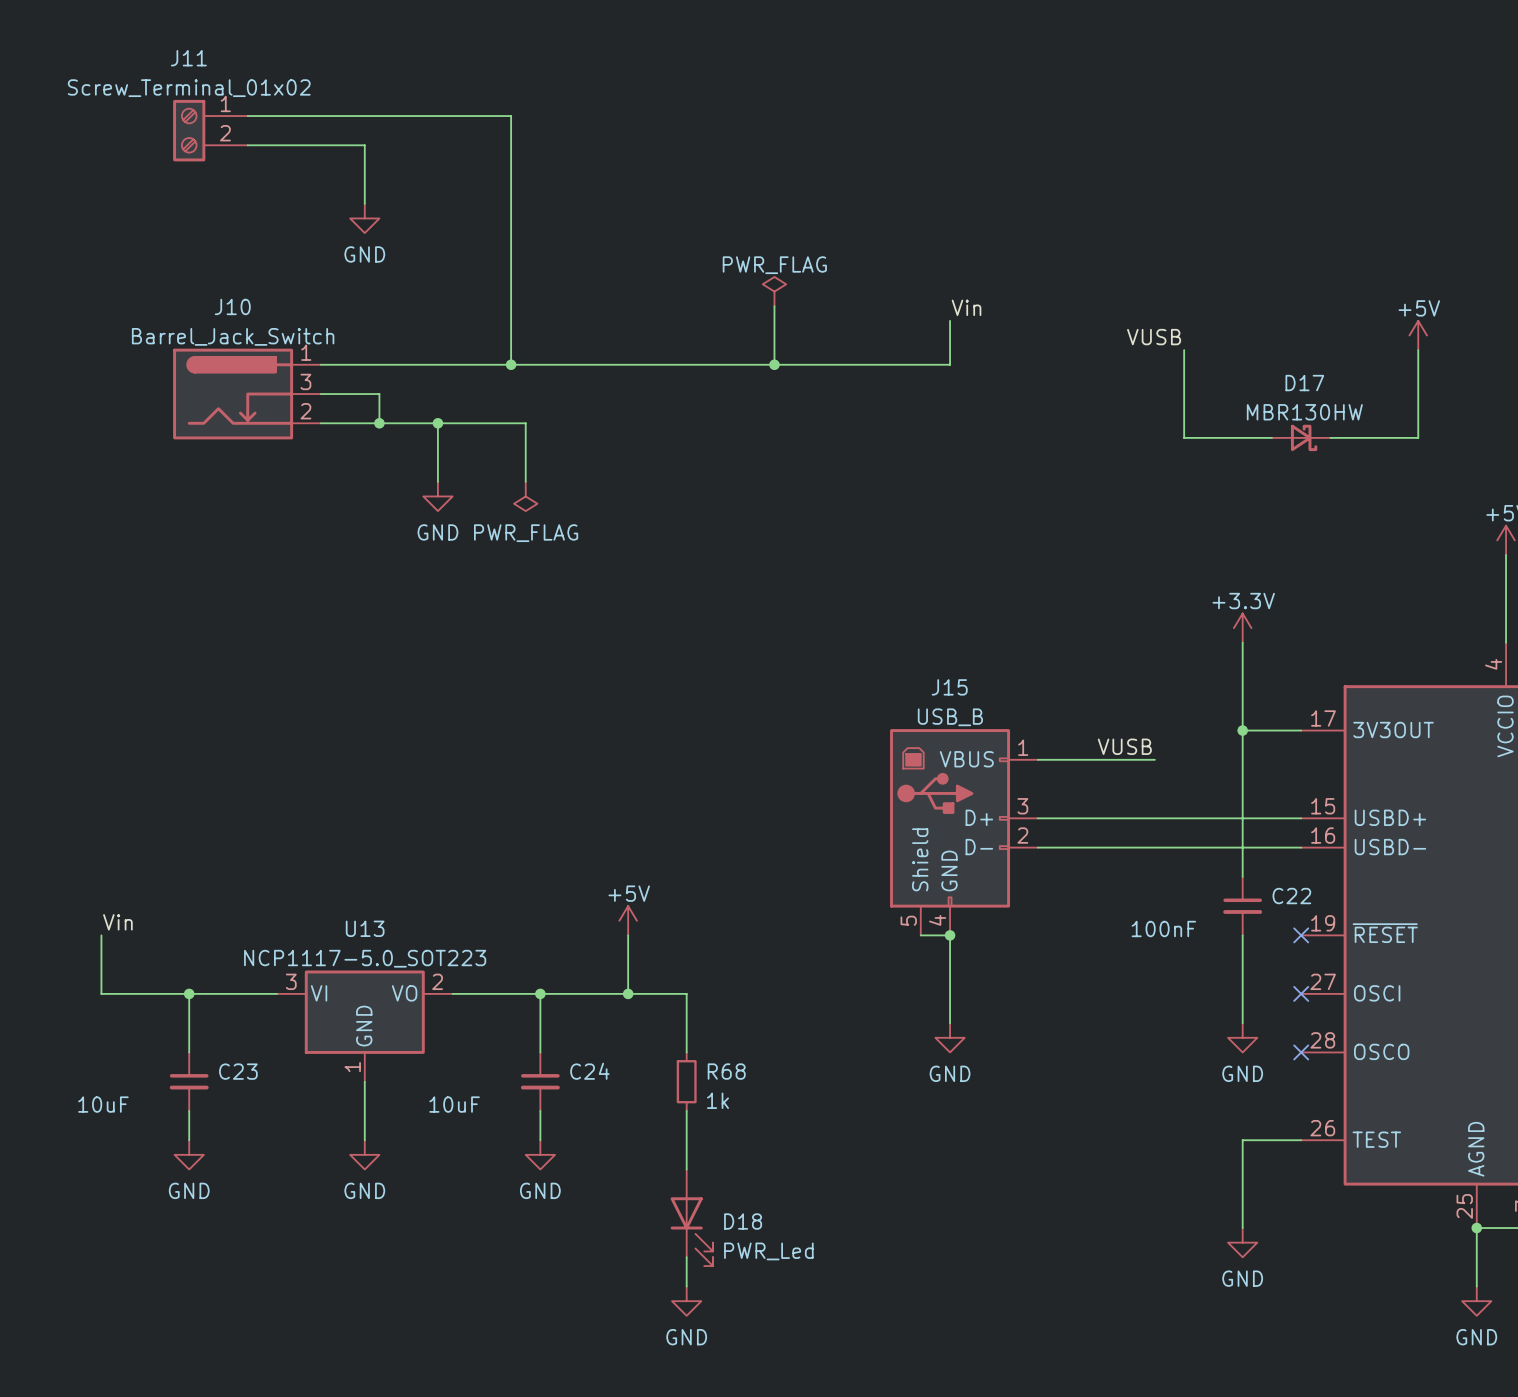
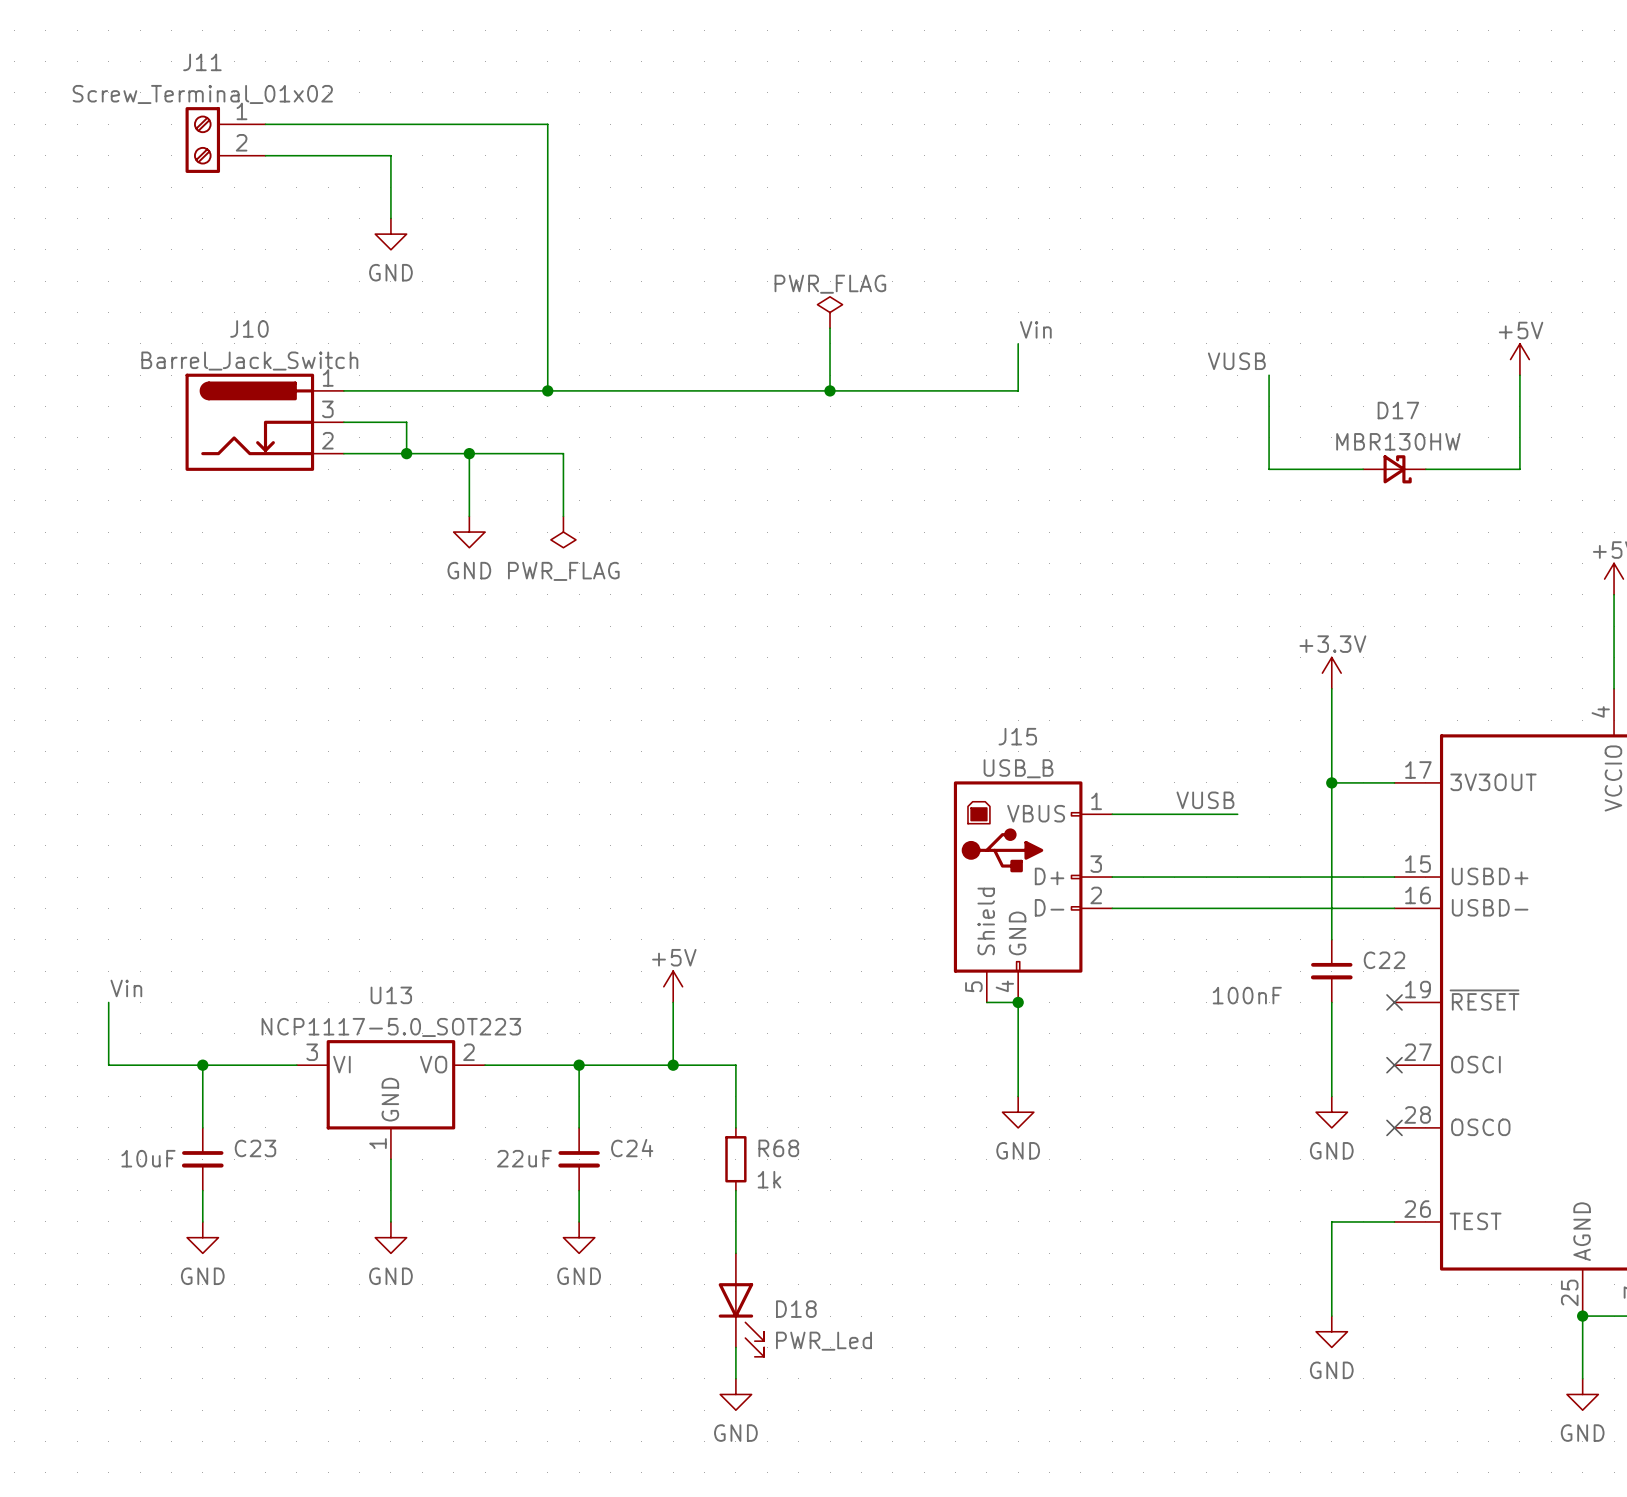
C23 value position: 10uF (103, 1104) -> 10uF (148, 1158)
C24 value: 10uF (454, 1104) -> 22uF (524, 1158)

